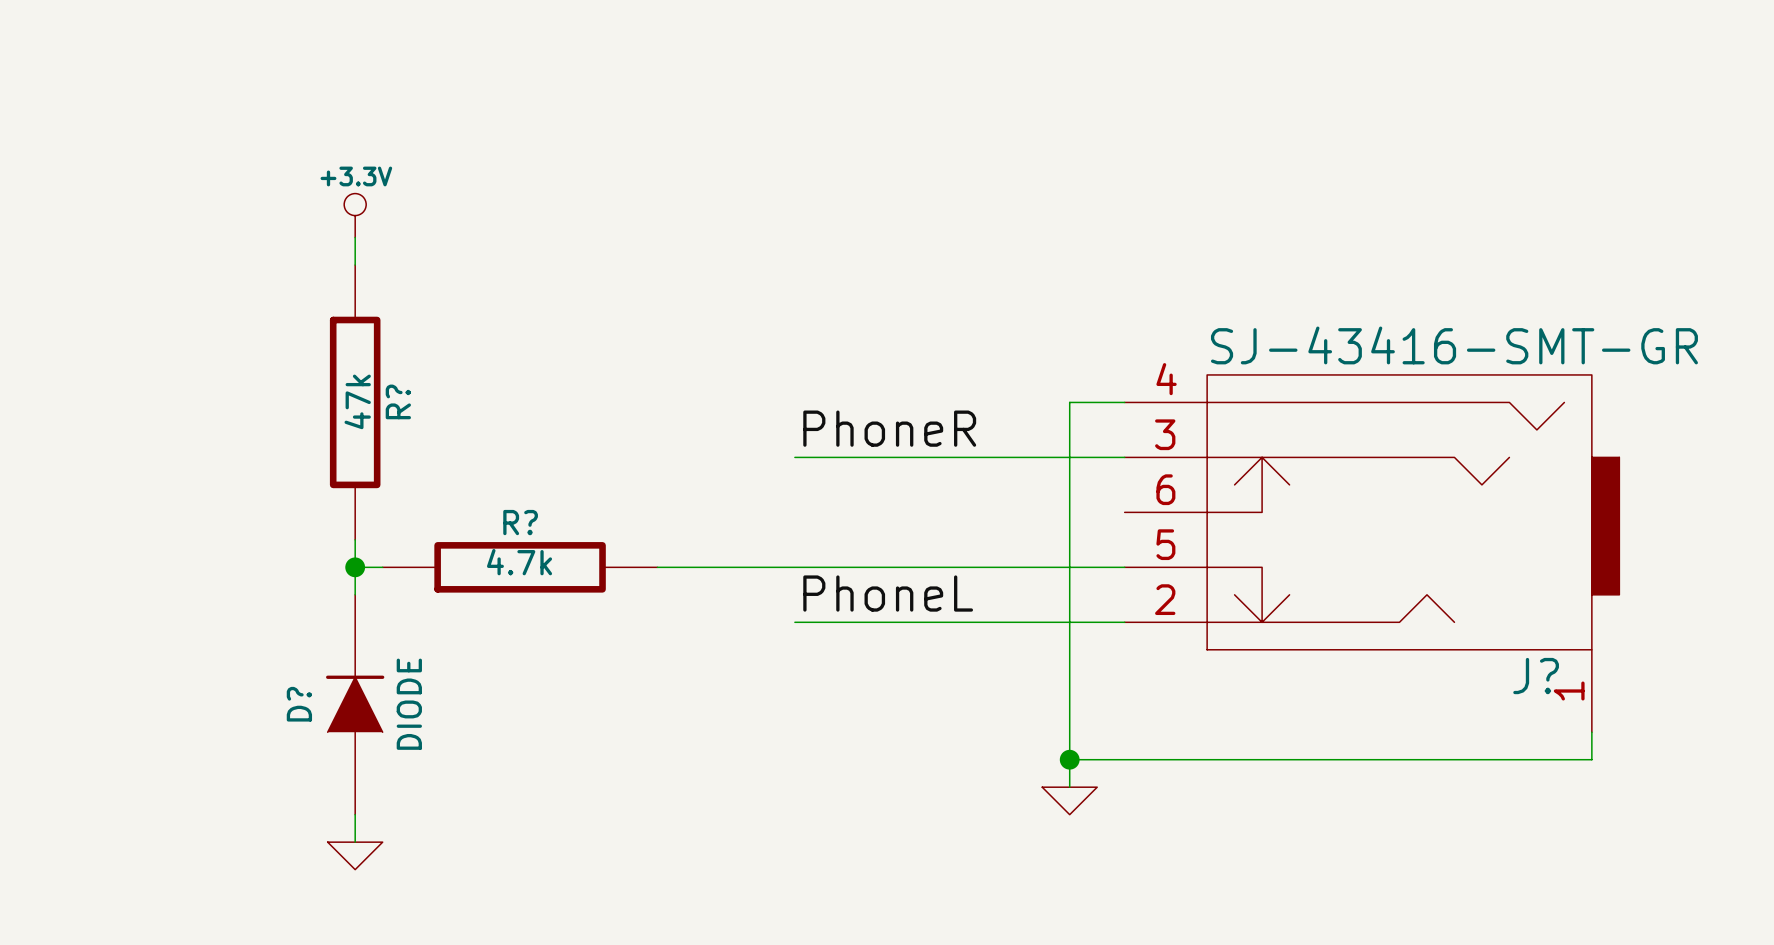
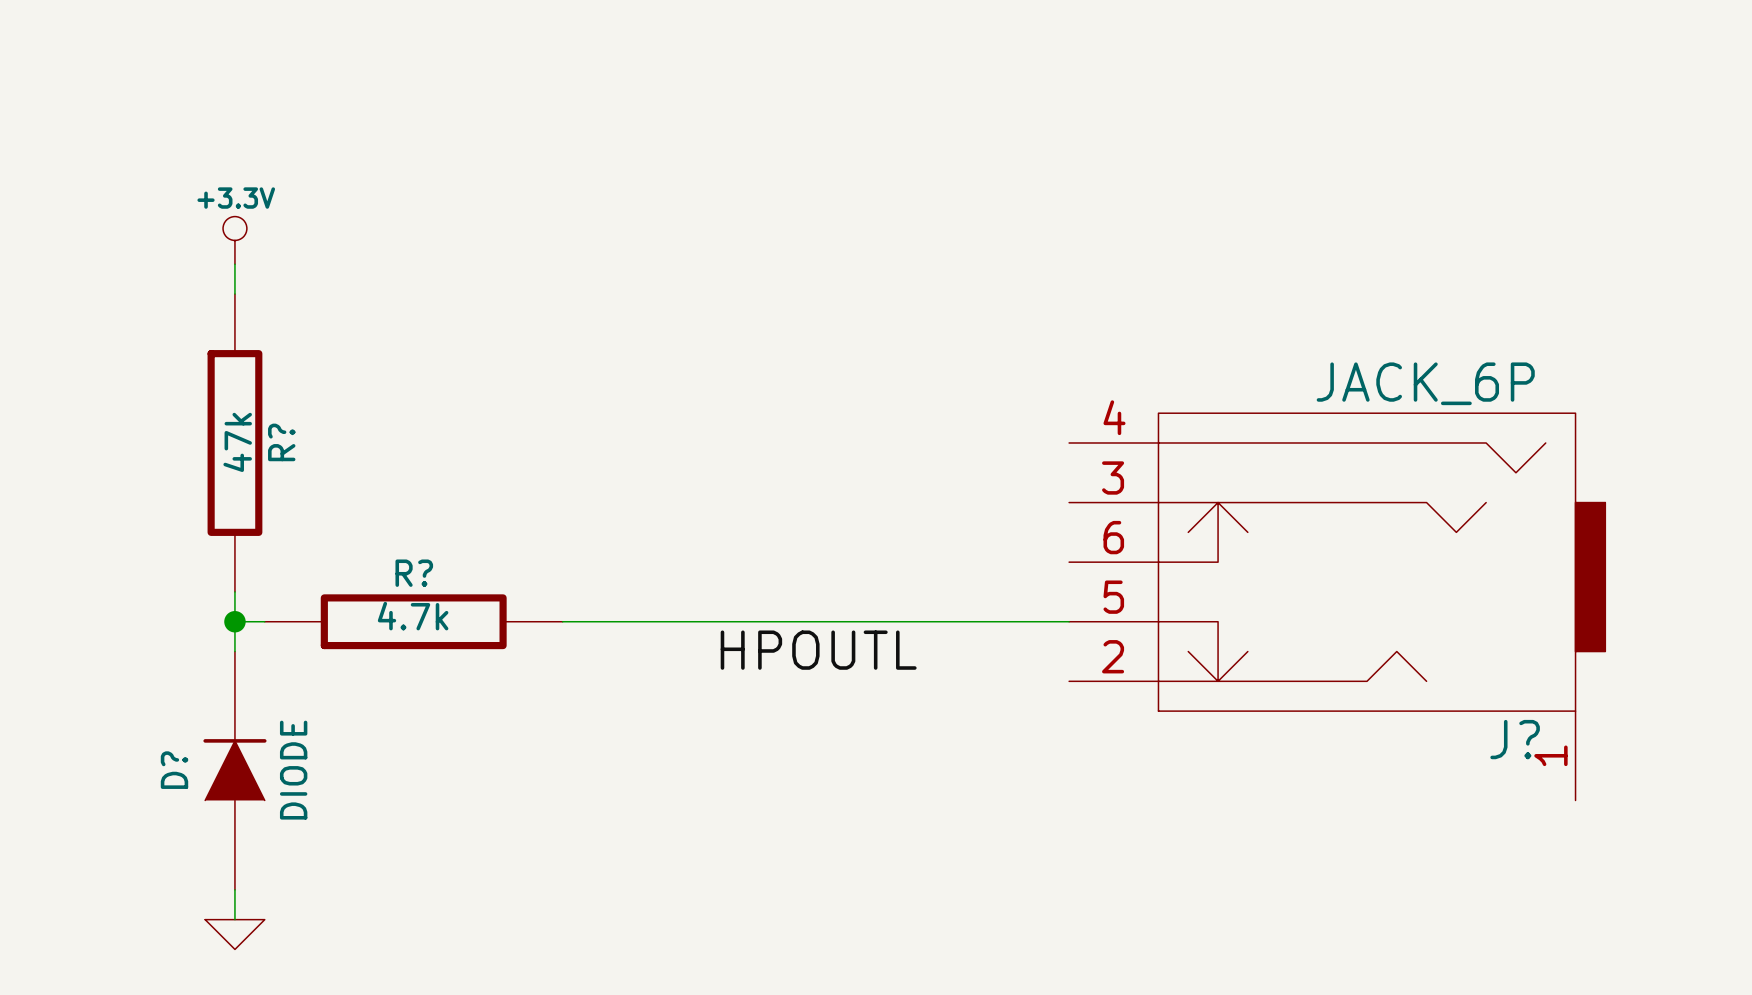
J? value: SJ-43416-SMT-GR (1454, 345) -> JACK_6P (1425, 383)
wire: (1124, 402) (1069, 402) (1069, 787) -> none
label: PhoneR (889, 428) -> none
wire: (794, 457) (1124, 457) -> none
label: PhoneL (888, 593) -> HPOUTL (818, 650)
wire: (794, 622) (1124, 622) -> none
wire: (1591, 732) (1591, 759) (1069, 759) -> none
junction: (1069, 759) -> none
power symbol: (1069, 800) -> none

